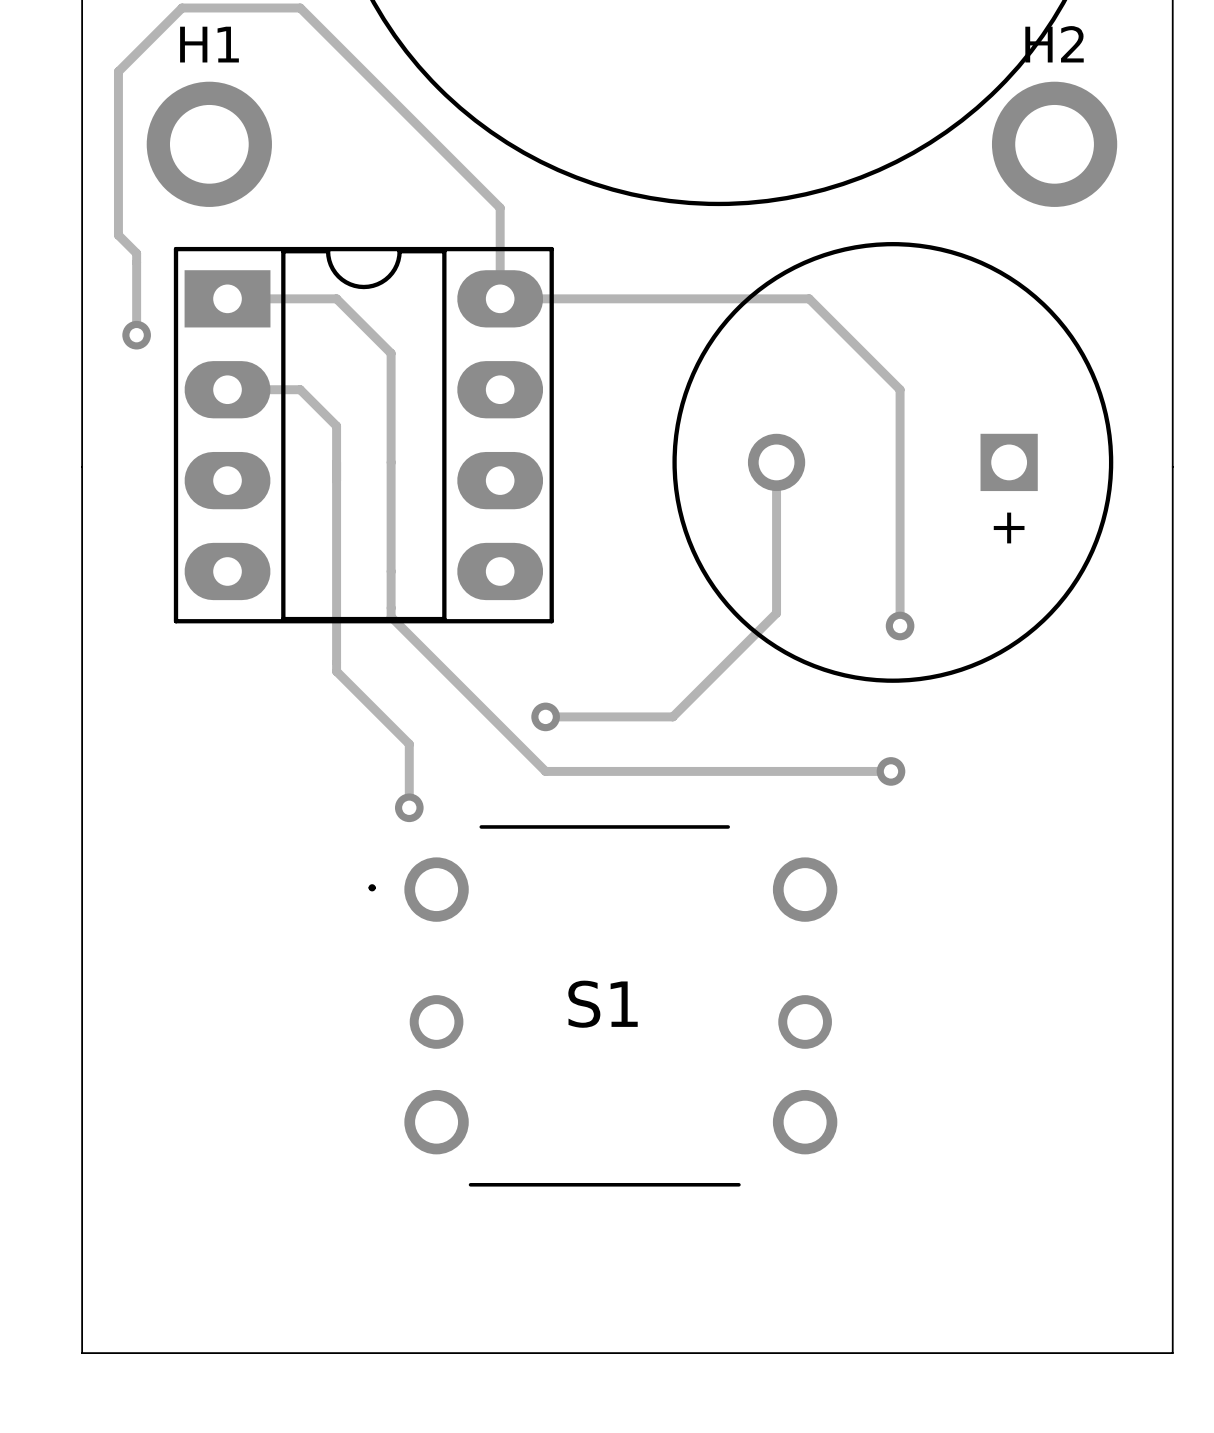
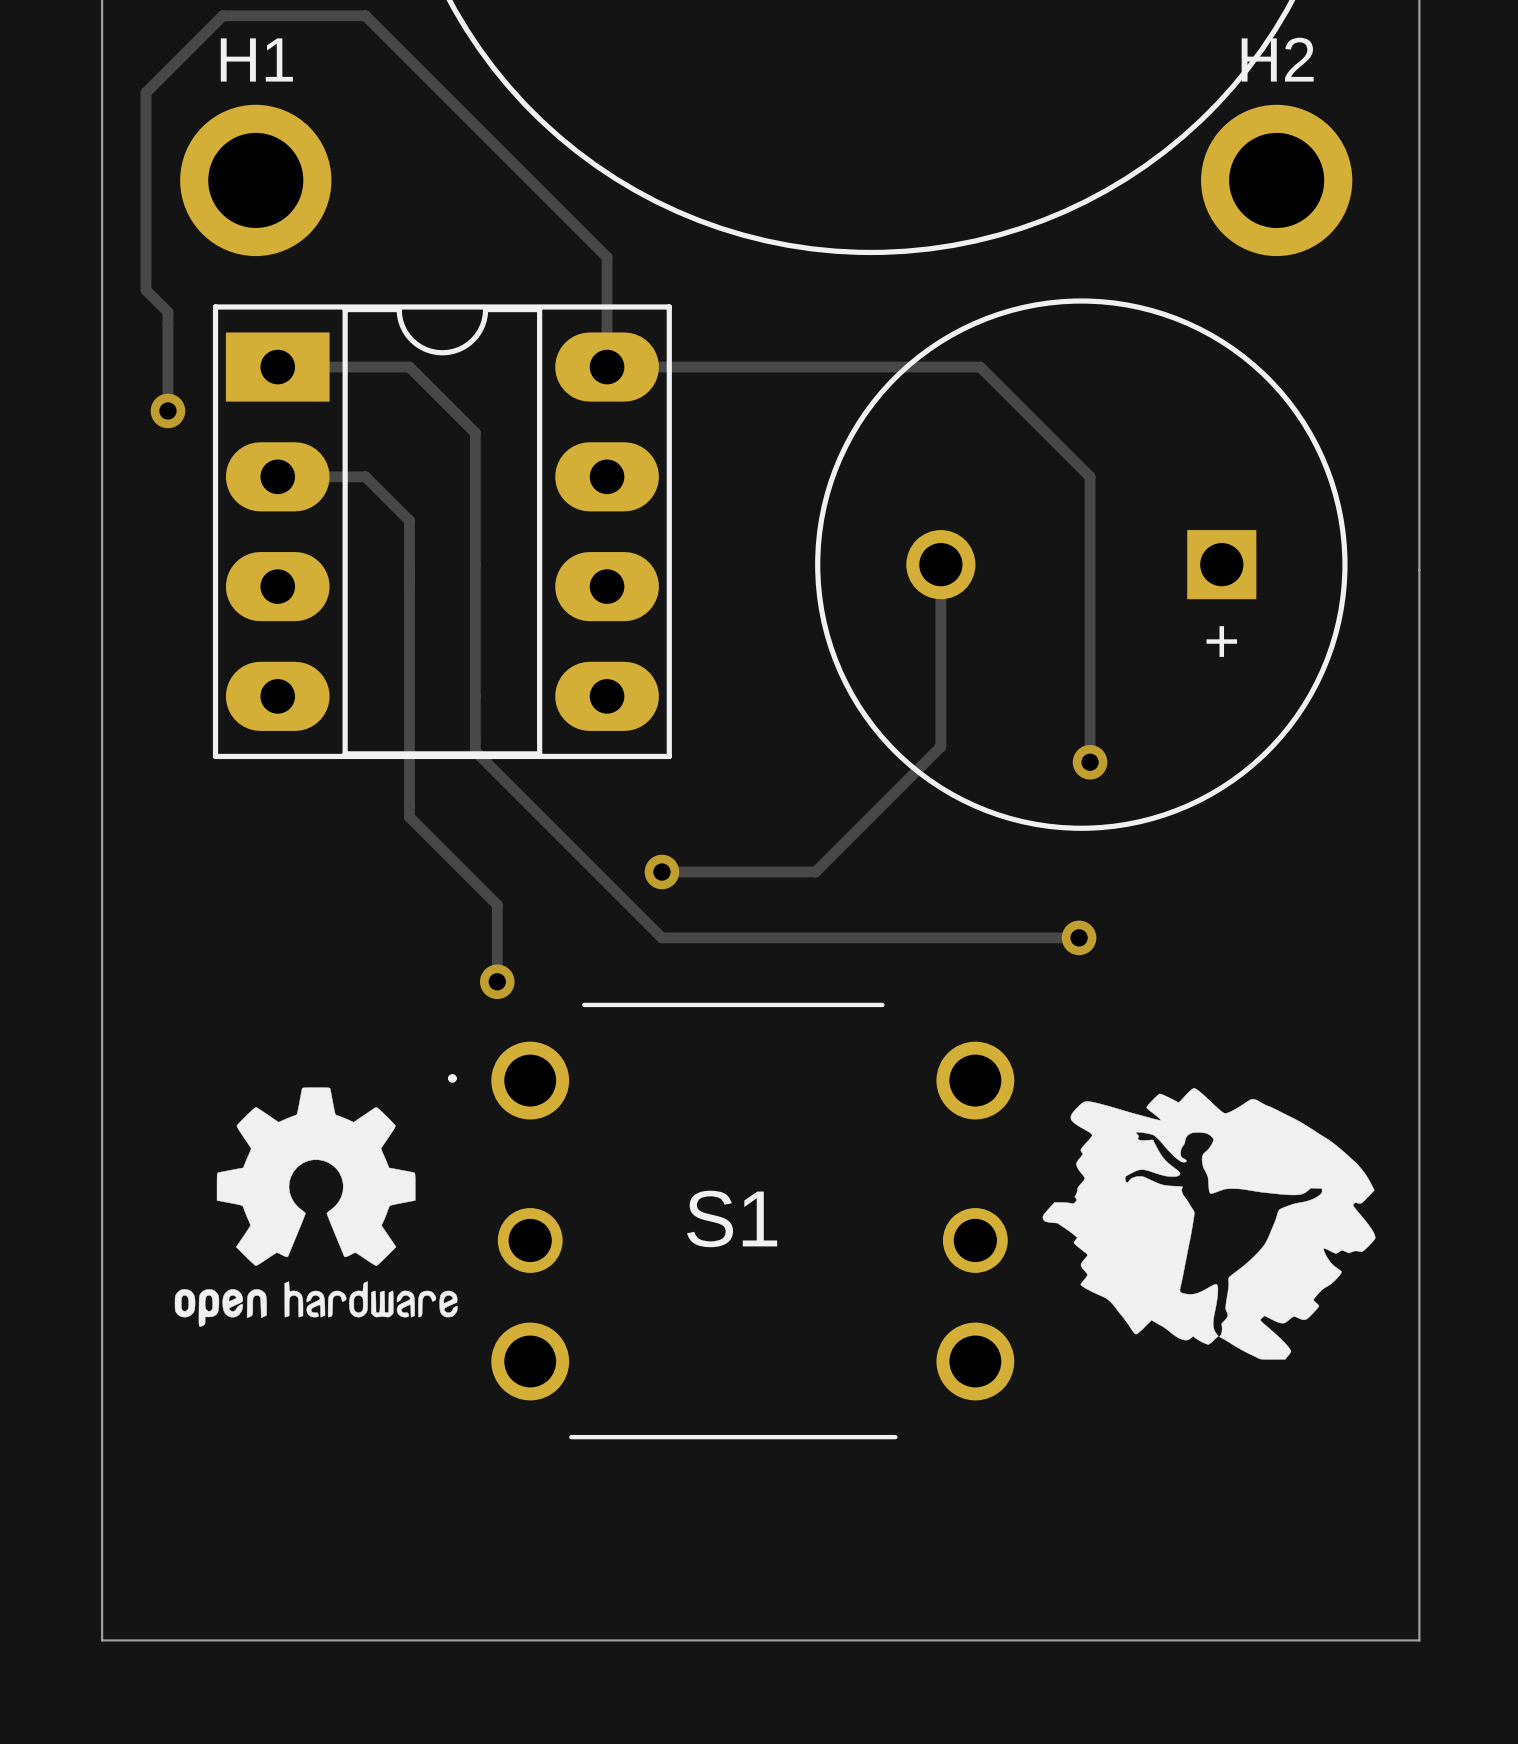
drawing: none -> [174, 1087, 458, 1327]
drawing: none -> [1042, 1088, 1376, 1360]

